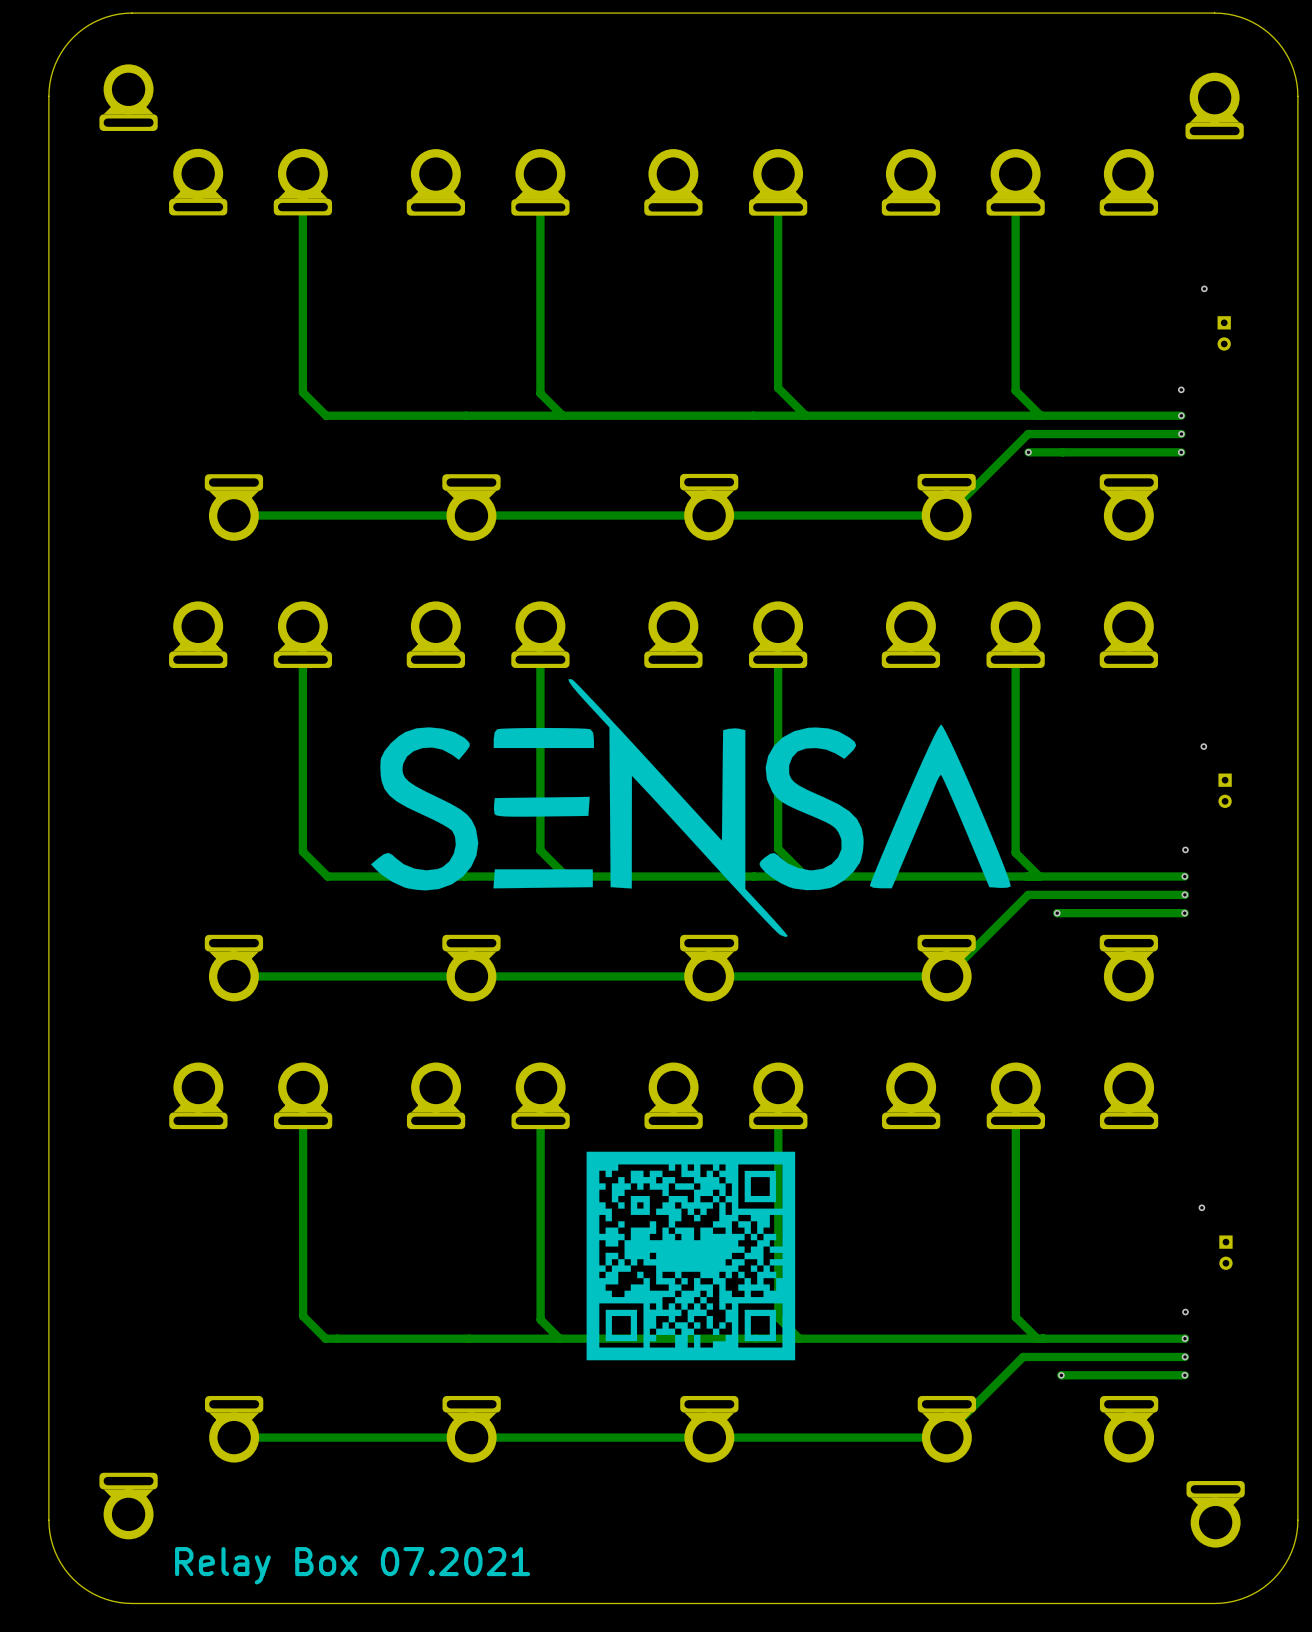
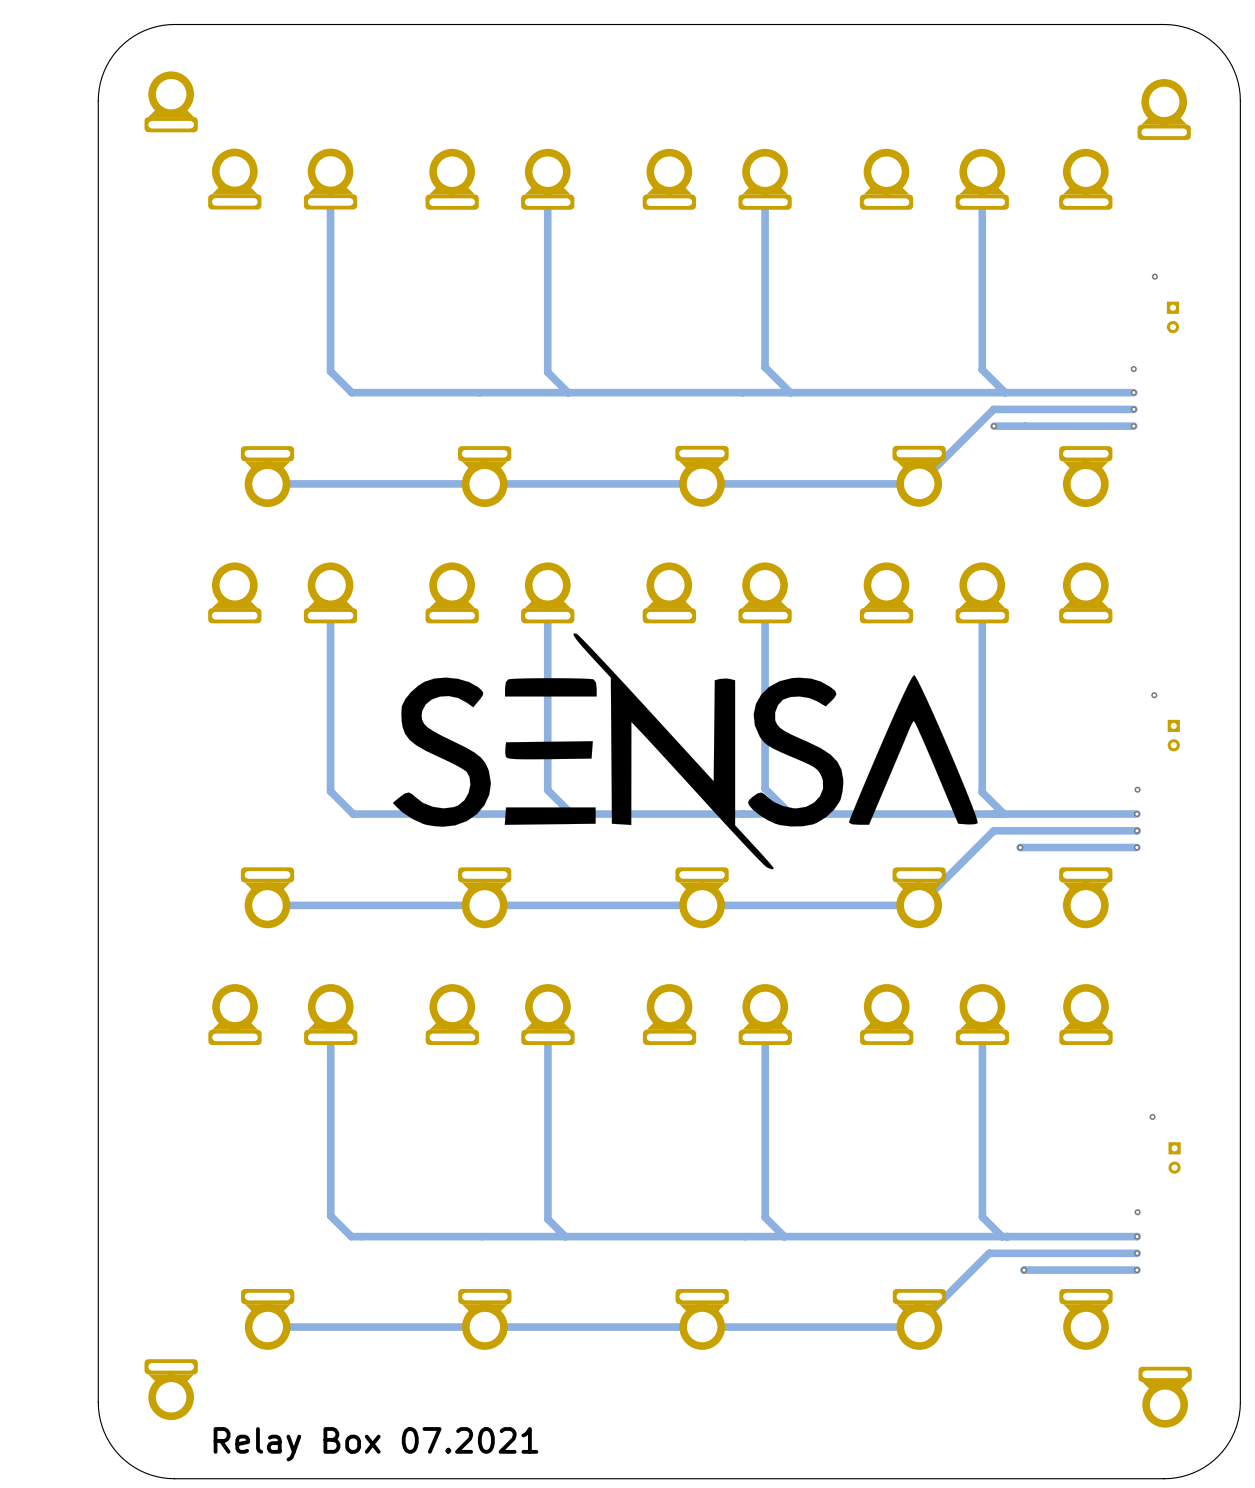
drawing: [586, 1151, 796, 1361] -> none

